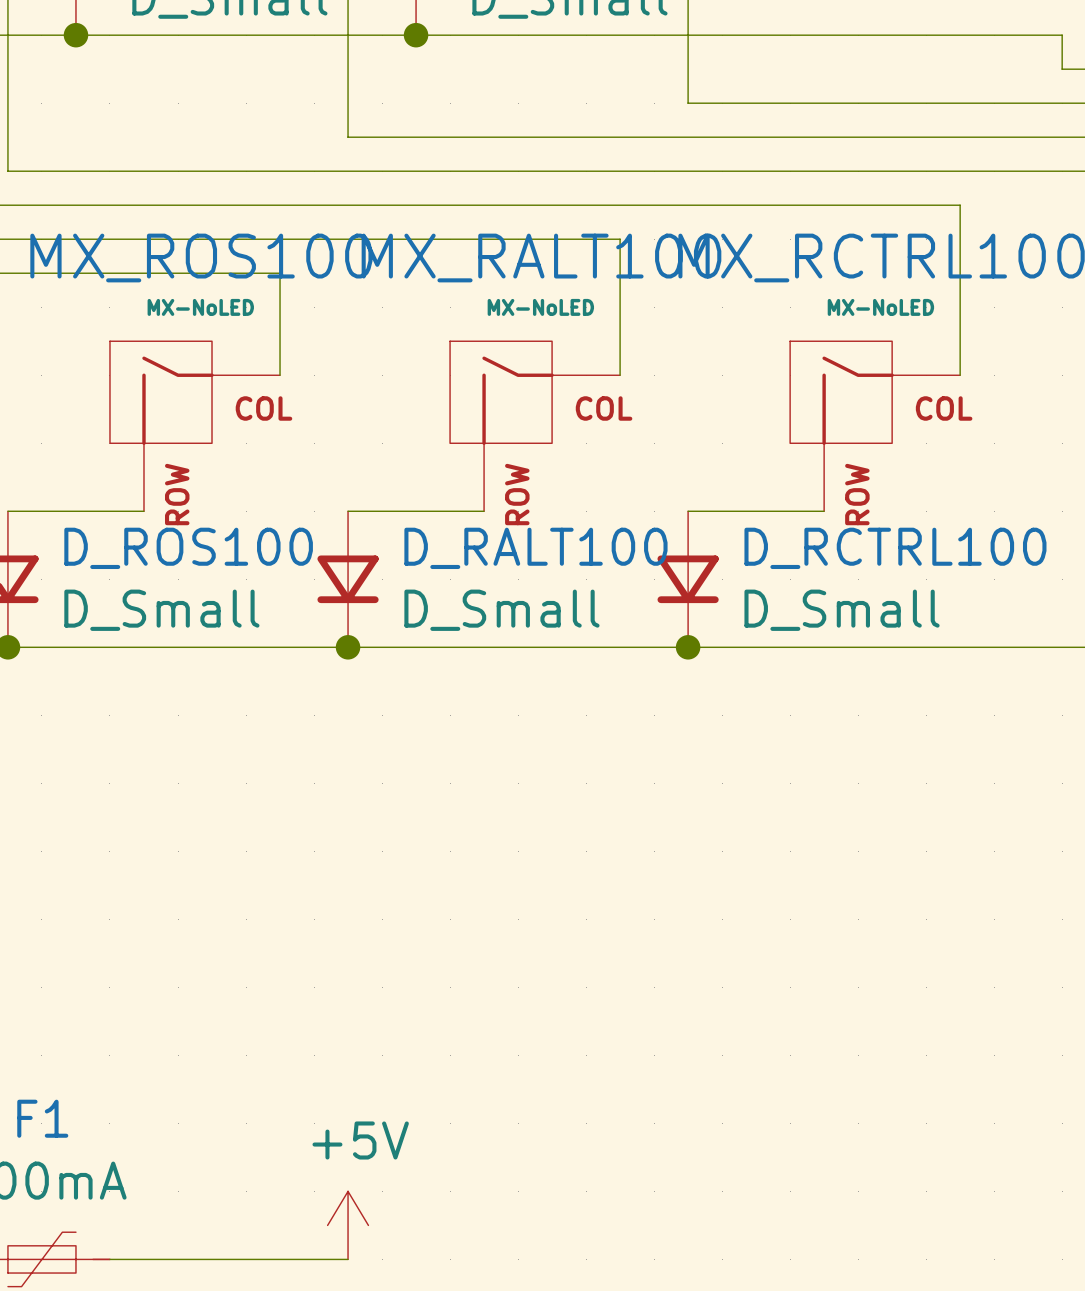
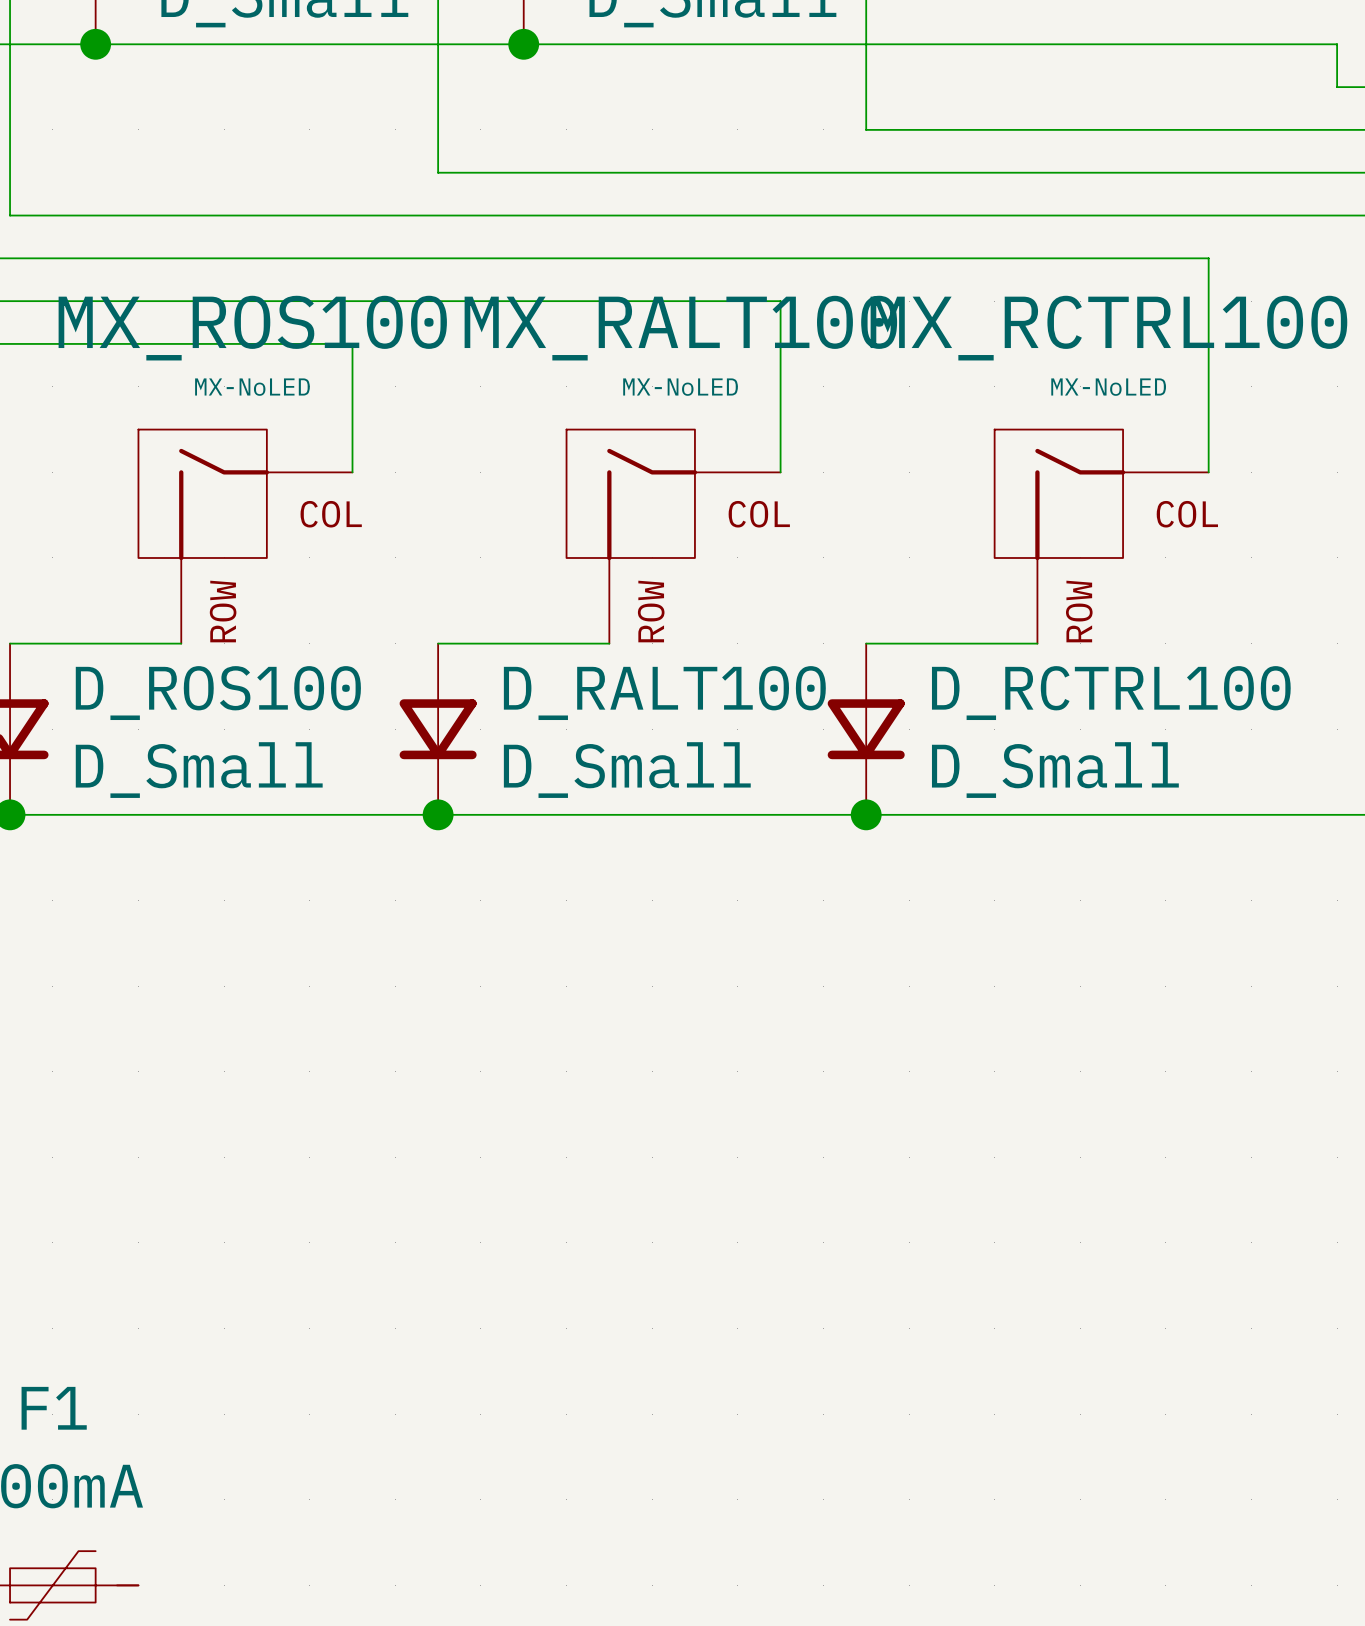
power symbol: +5V (348, 1225) -> none
wire: (109, 1259) (348, 1259) -> none

